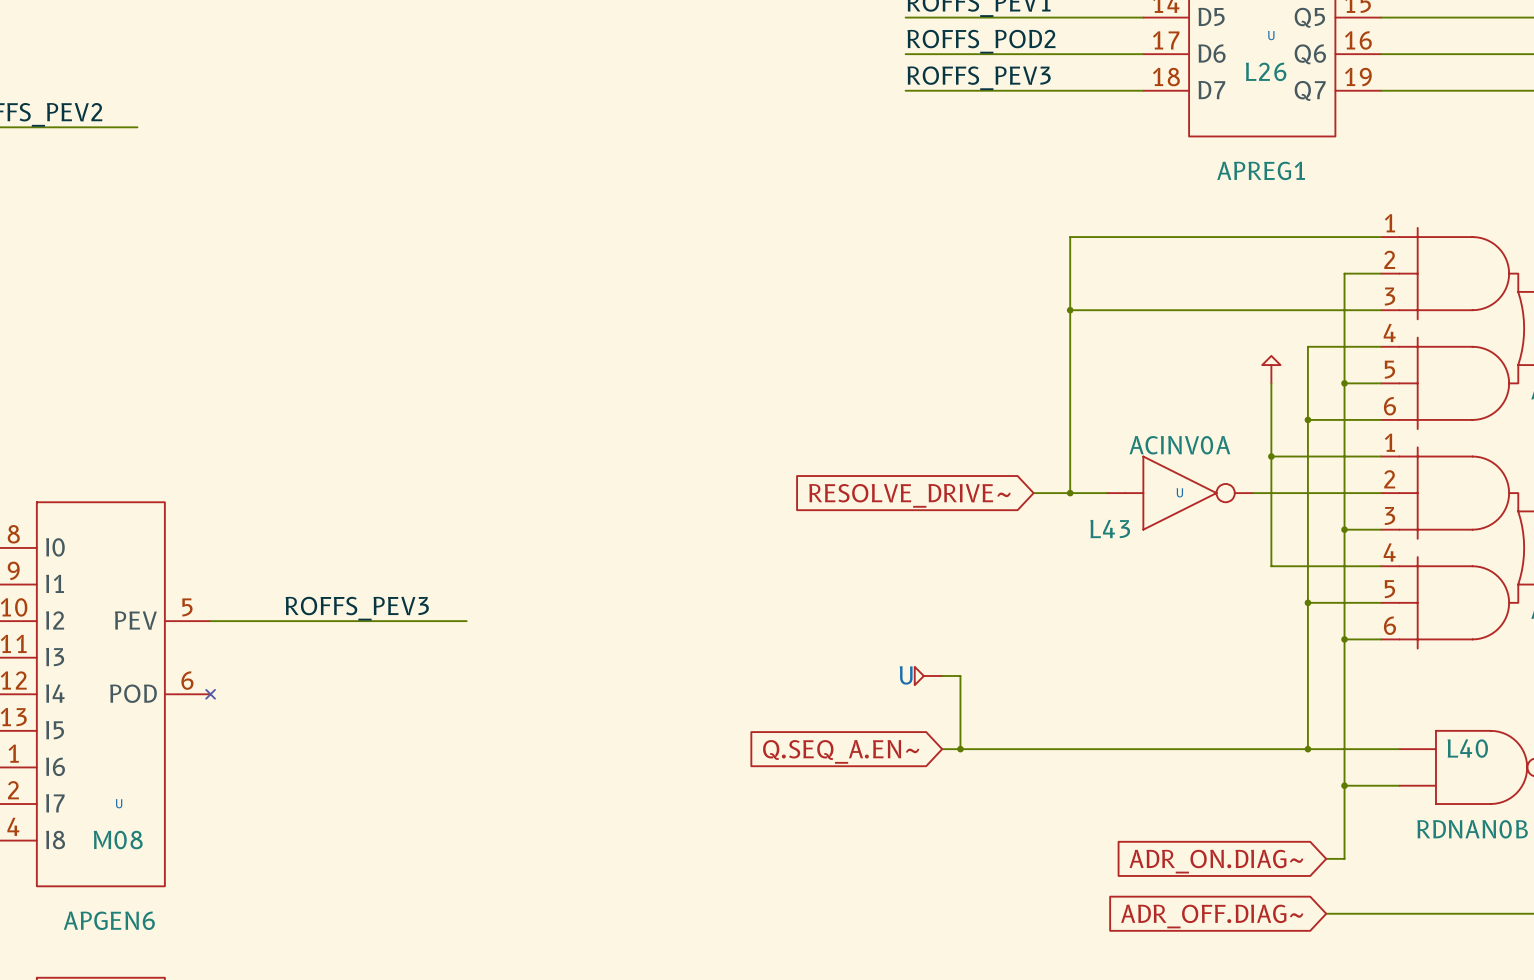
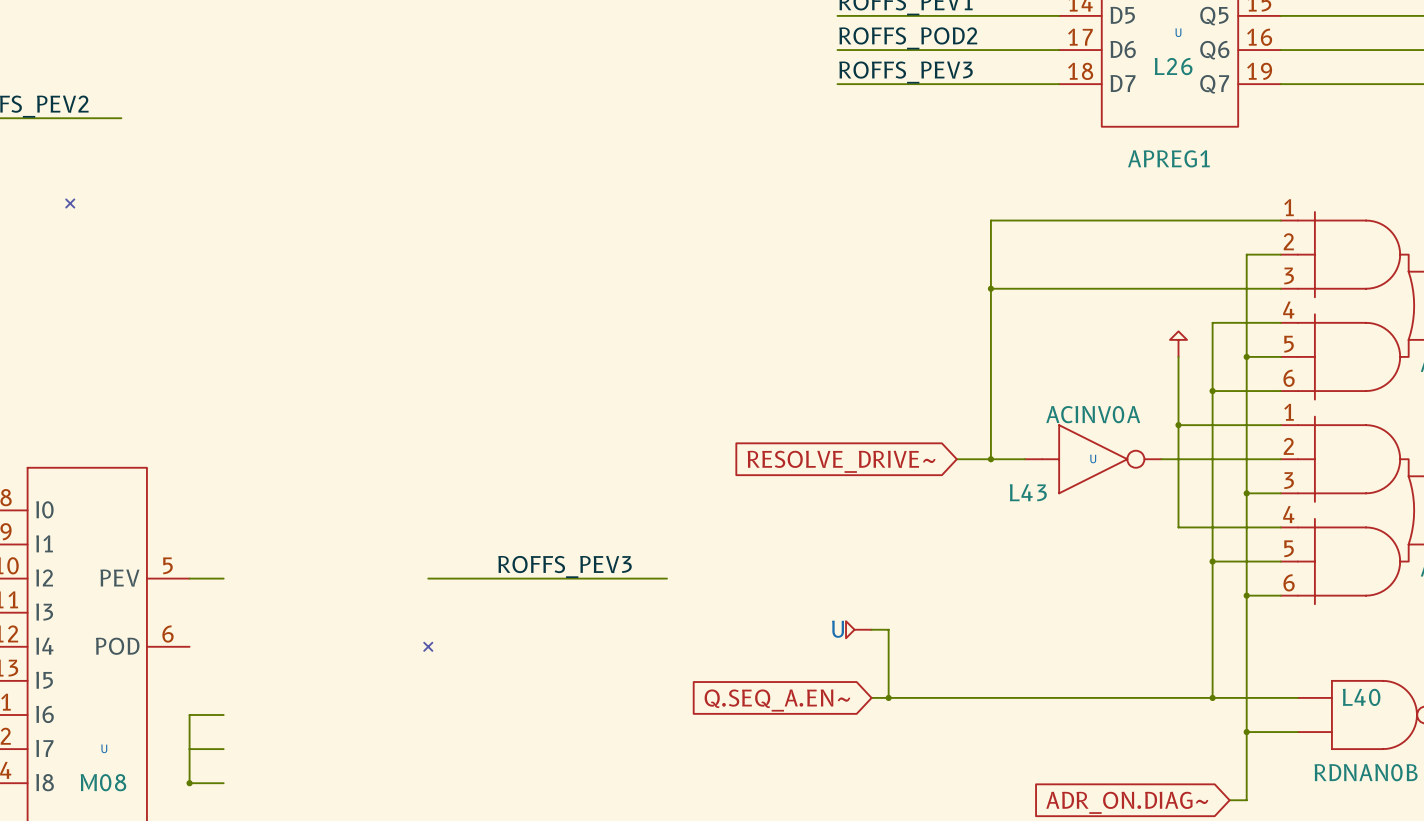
no-connect mark: none -> (70, 203)
label: ROFFS_PEV3 (357, 608) -> none
label: none -> ROFFS_PEV3 (564, 566)
wire: (247, 621) (466, 621) -> (666, 578) (428, 578)
no-connect mark: (210, 694) -> none
no-connect mark: none -> (428, 646)
wire: none -> (223, 715) (189, 715) (189, 783) (223, 783)
wire: none -> (189, 749) (223, 749)
junction: none -> (189, 783)

